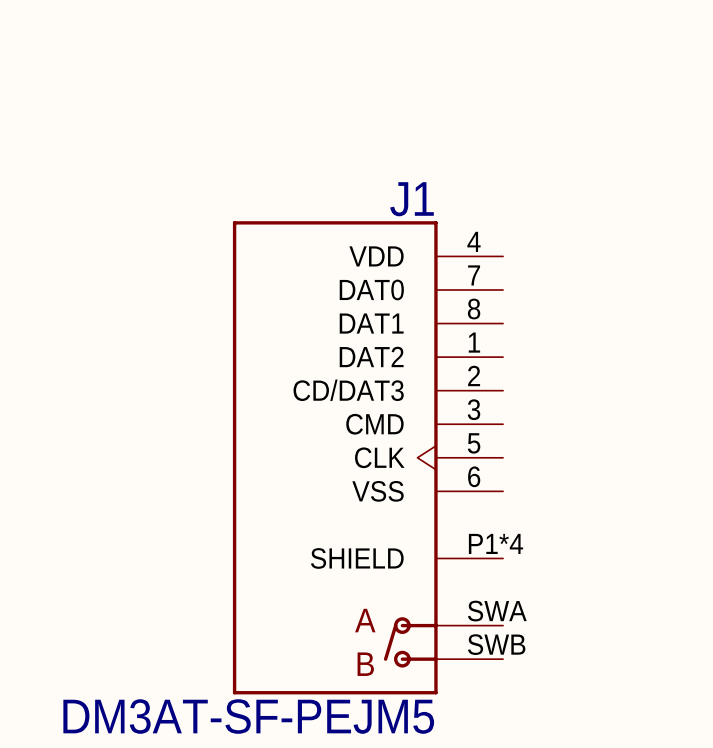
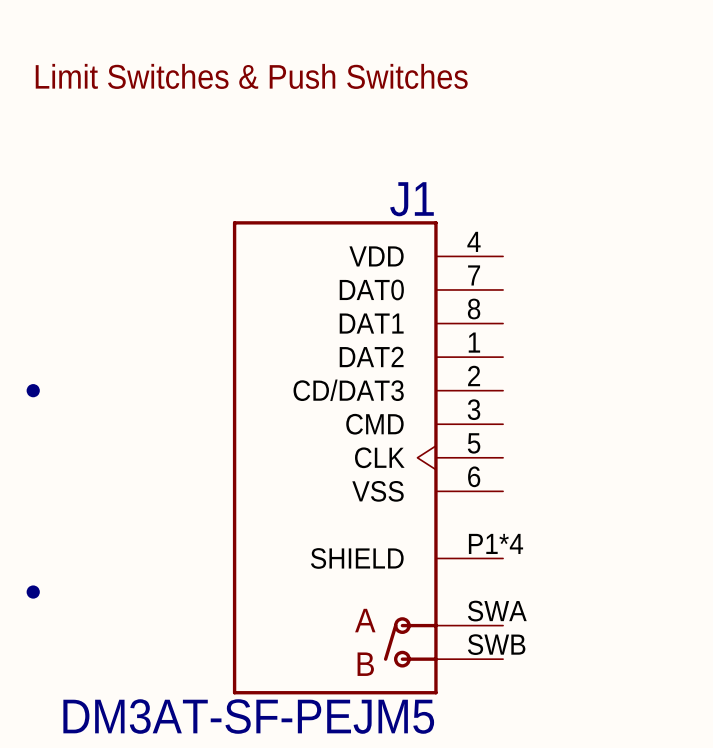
text: none -> Limit Switches & Push Switches (251, 76)
junction: none -> (33, 390)
junction: none -> (33, 592)

